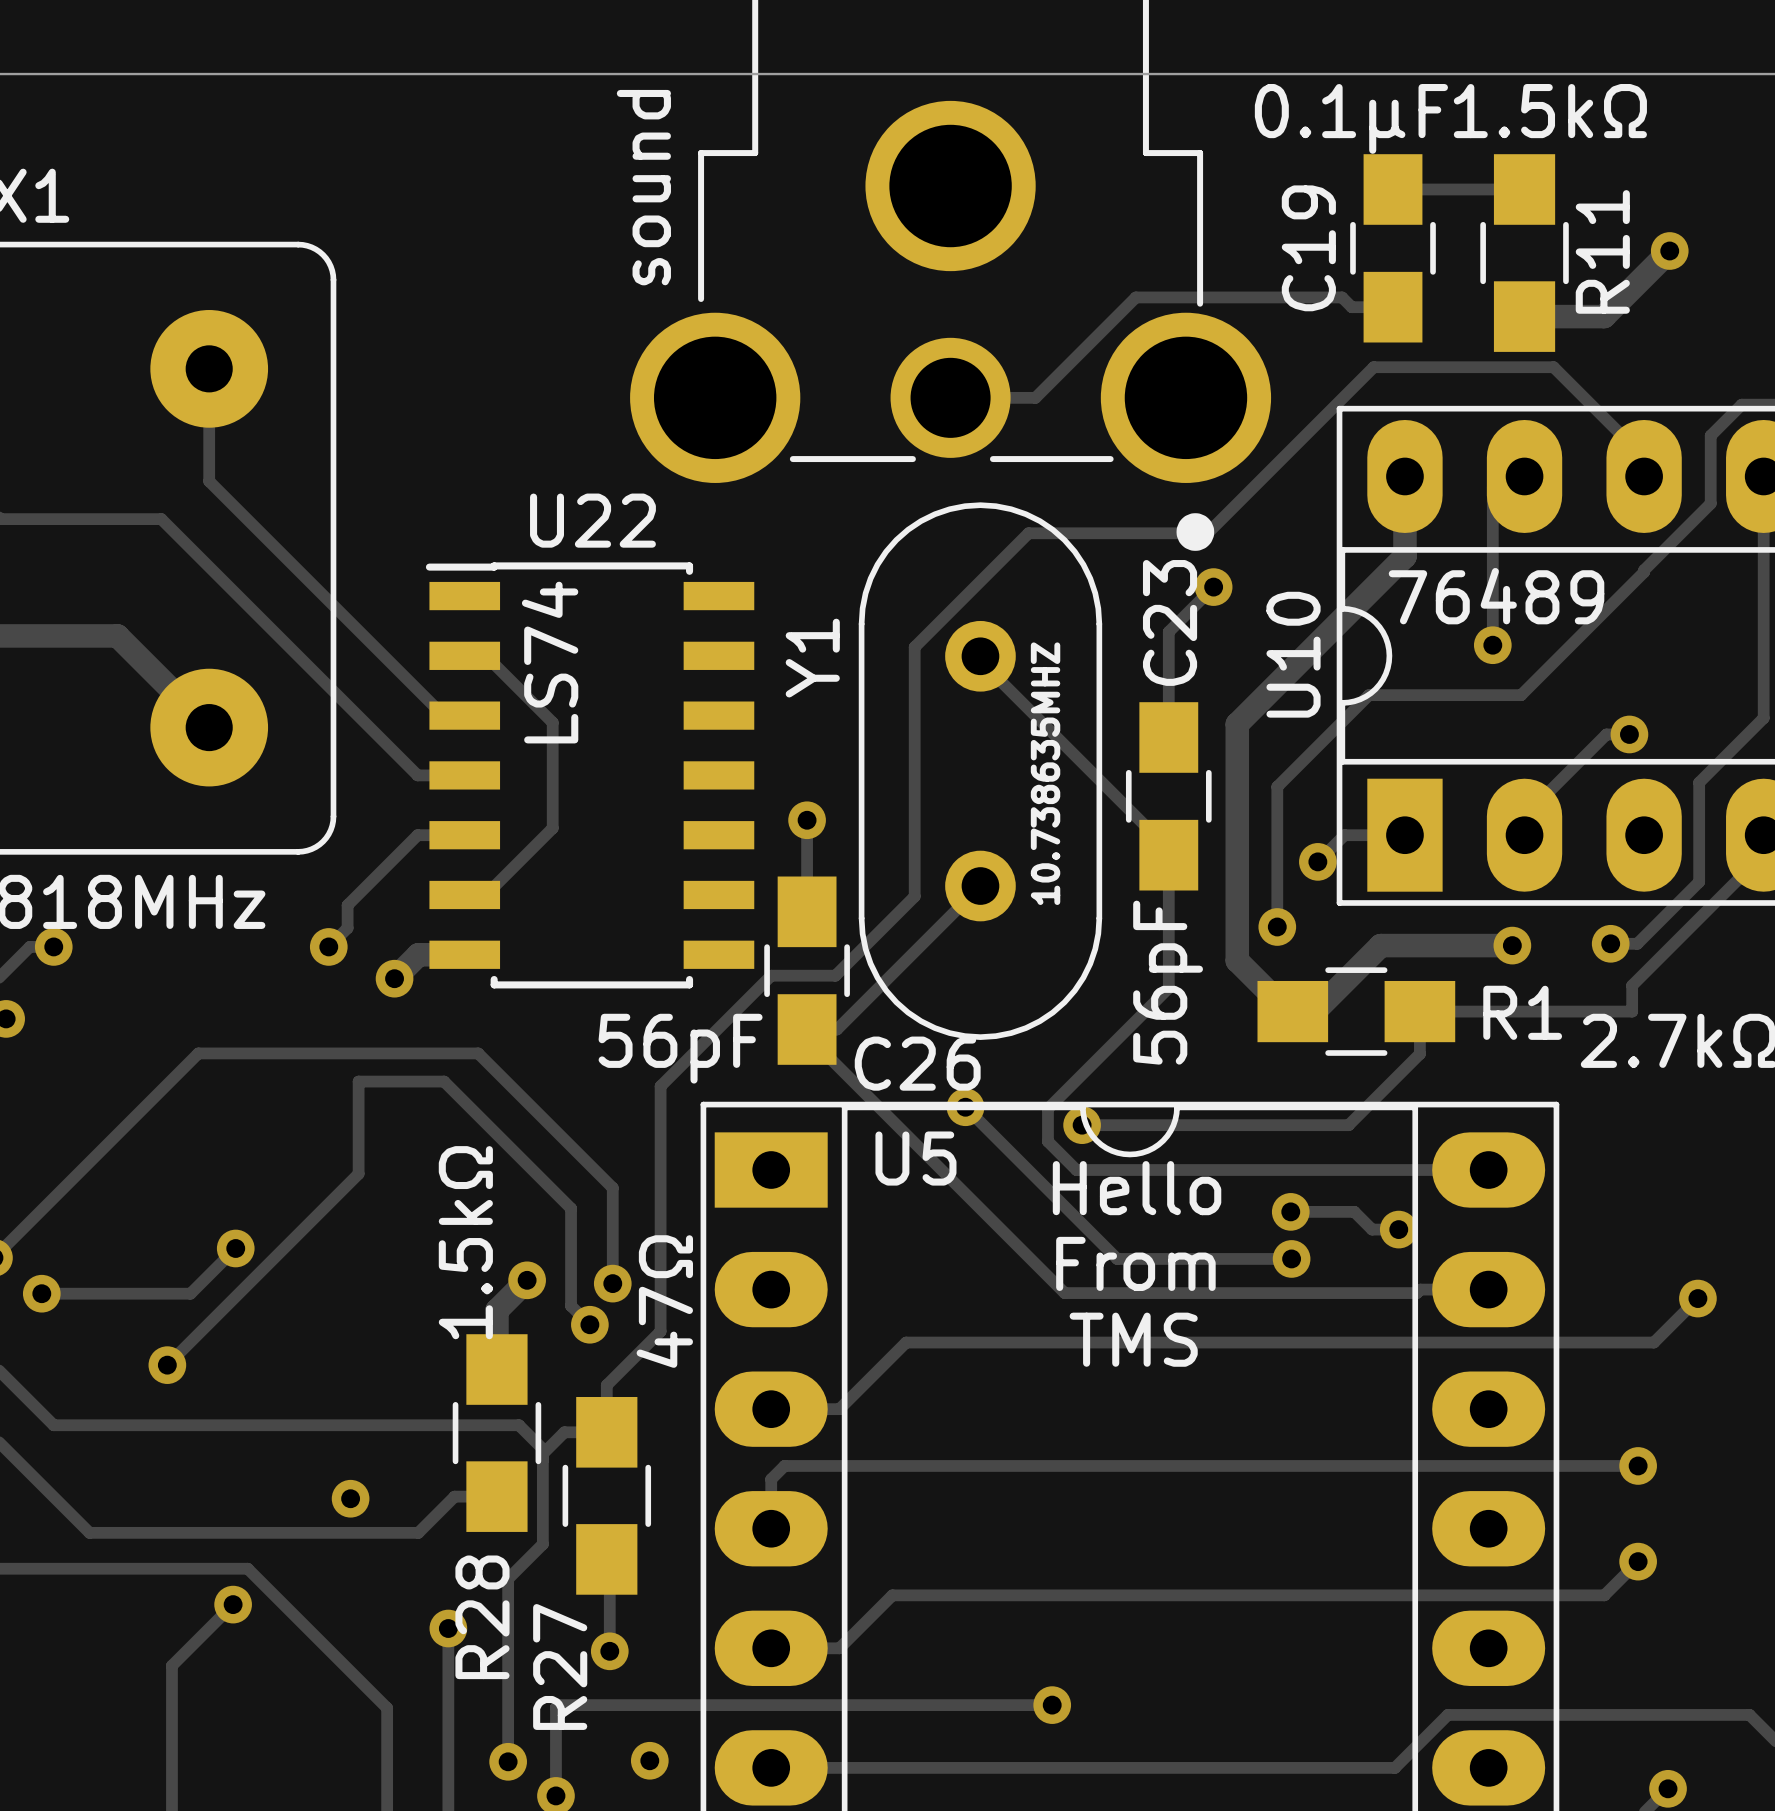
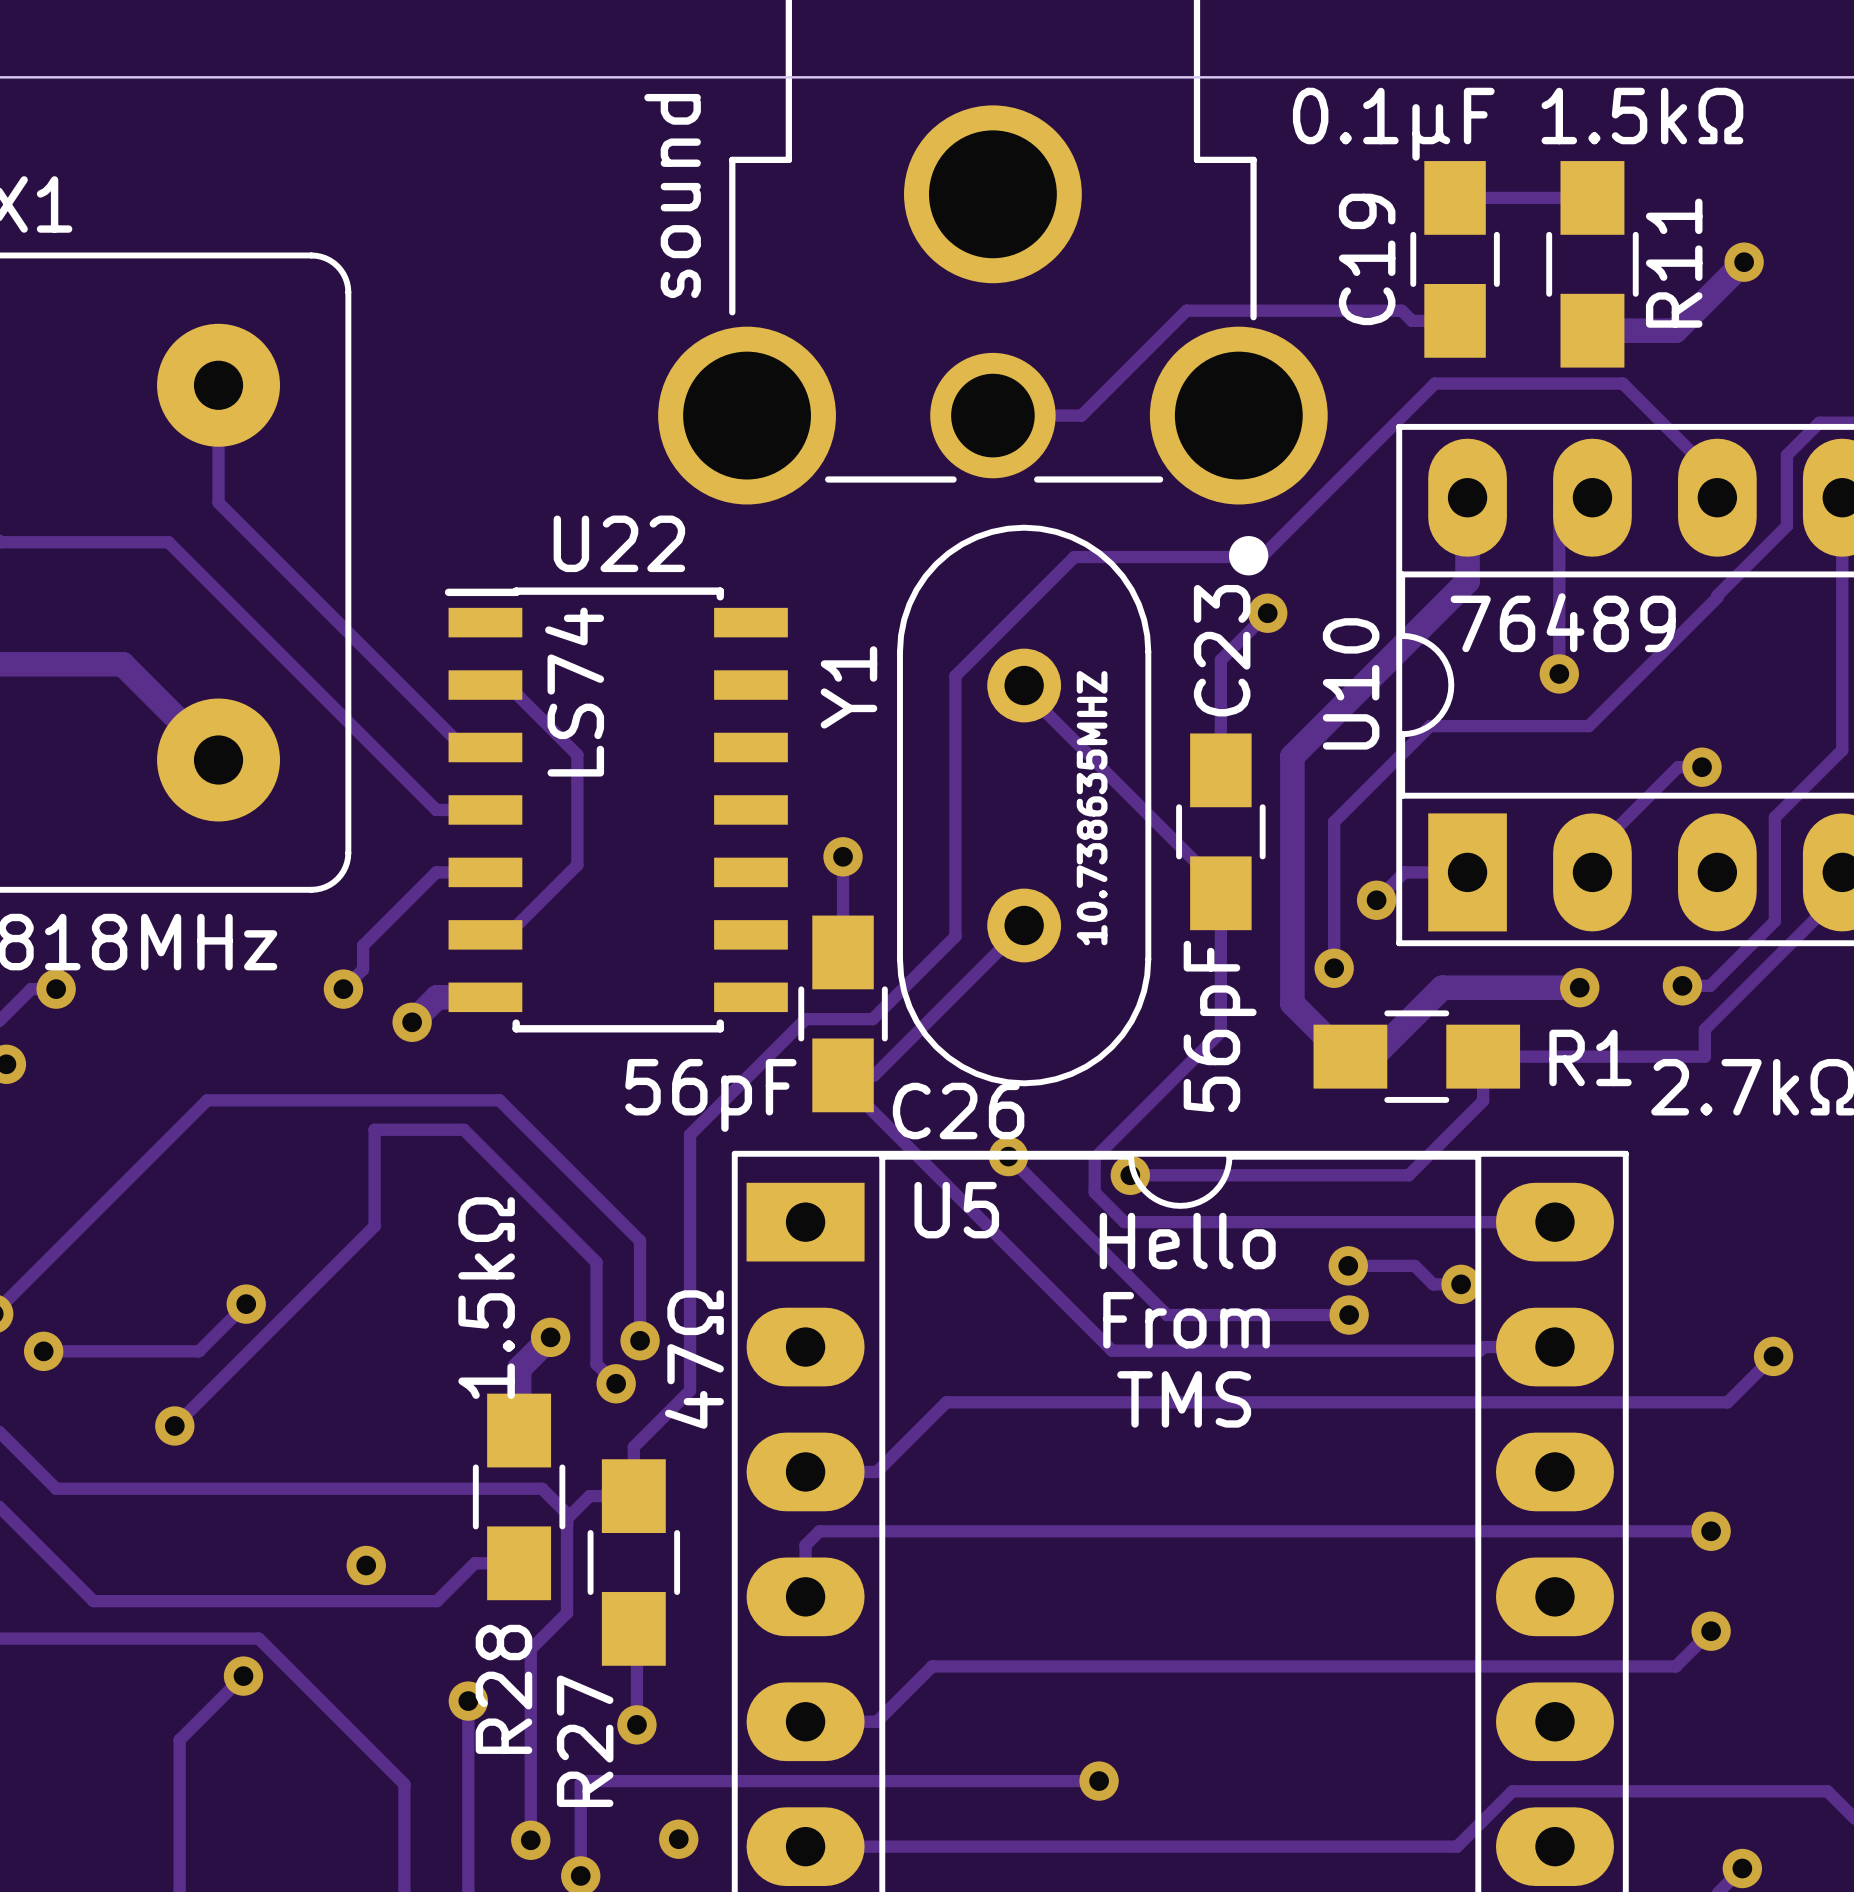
R11 value position: 1.5kΩ (1550, 111) -> 1.5kΩ (1642, 116)
C19 value position: 0.1µF (1351, 118) -> 0.1µF (1393, 124)

